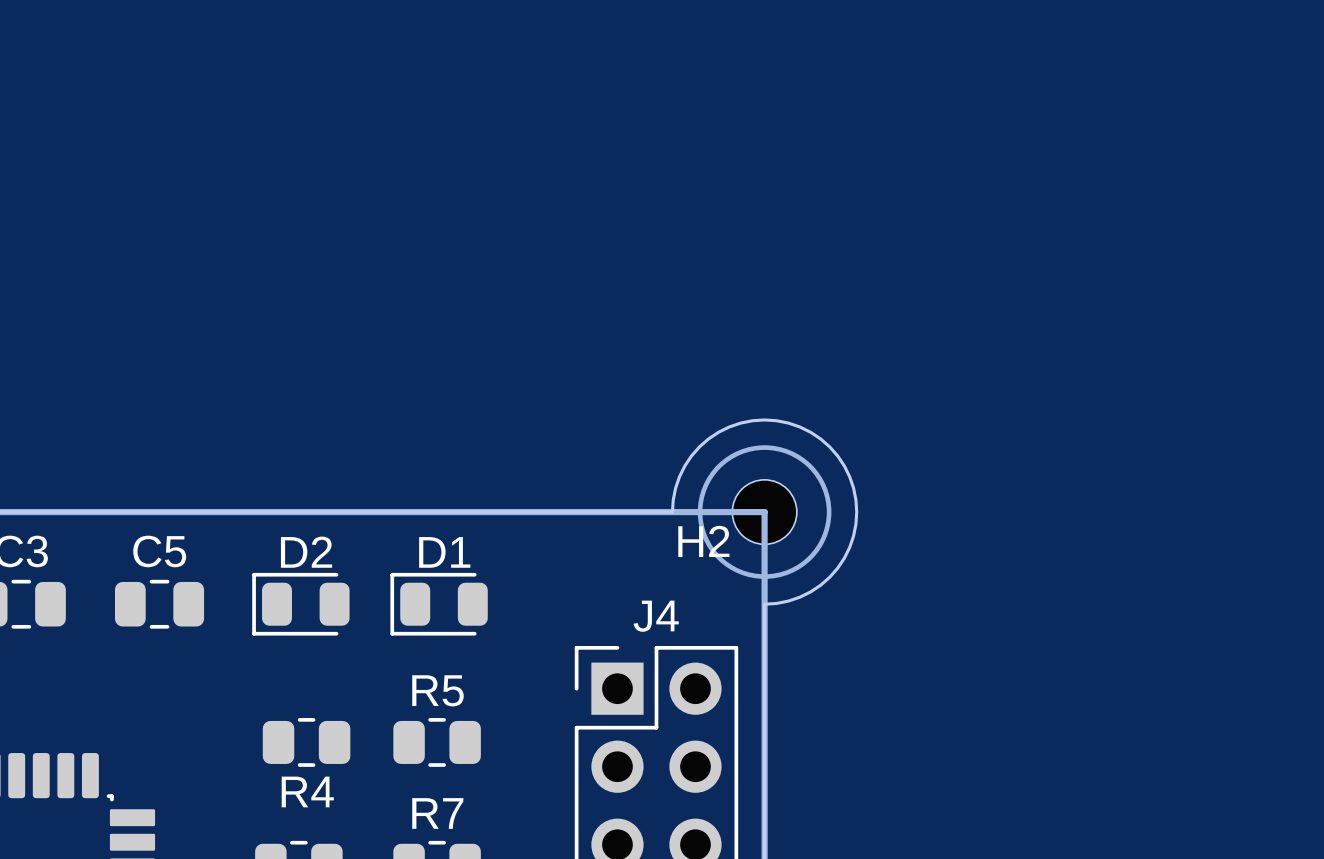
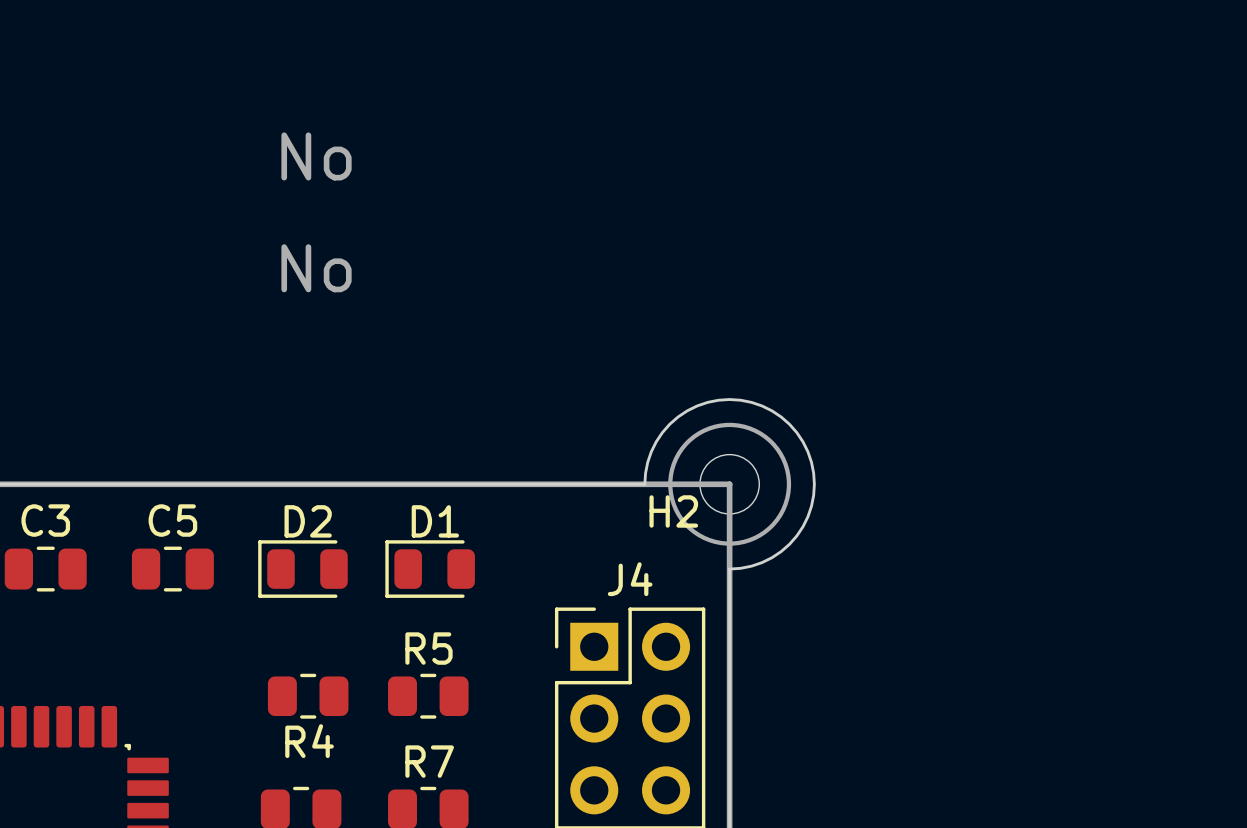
text: none -> No (316, 156)
text: none -> No (316, 268)

